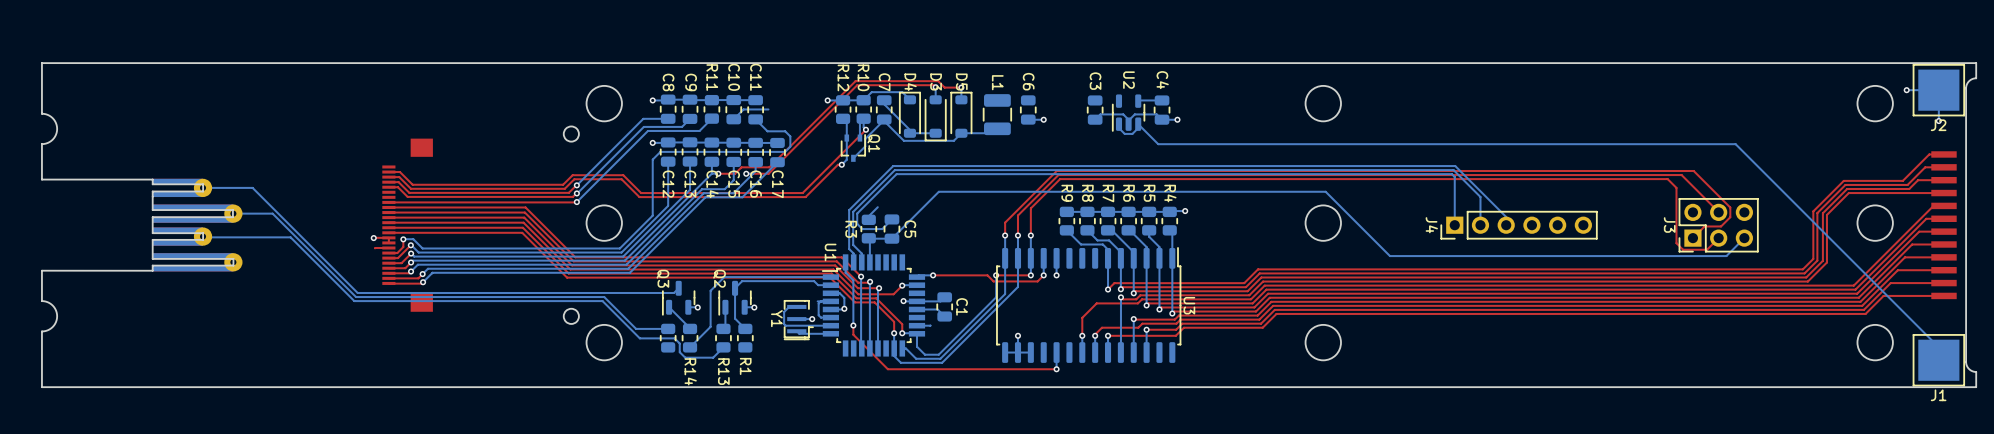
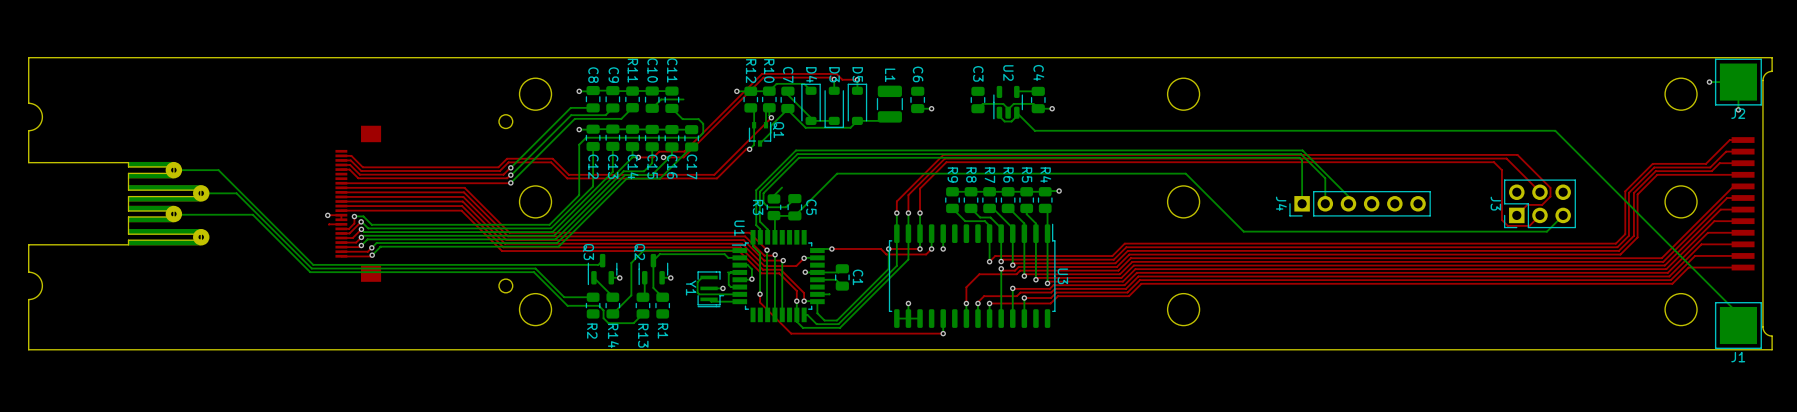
R2 name: none -> R2 (592, 331)

